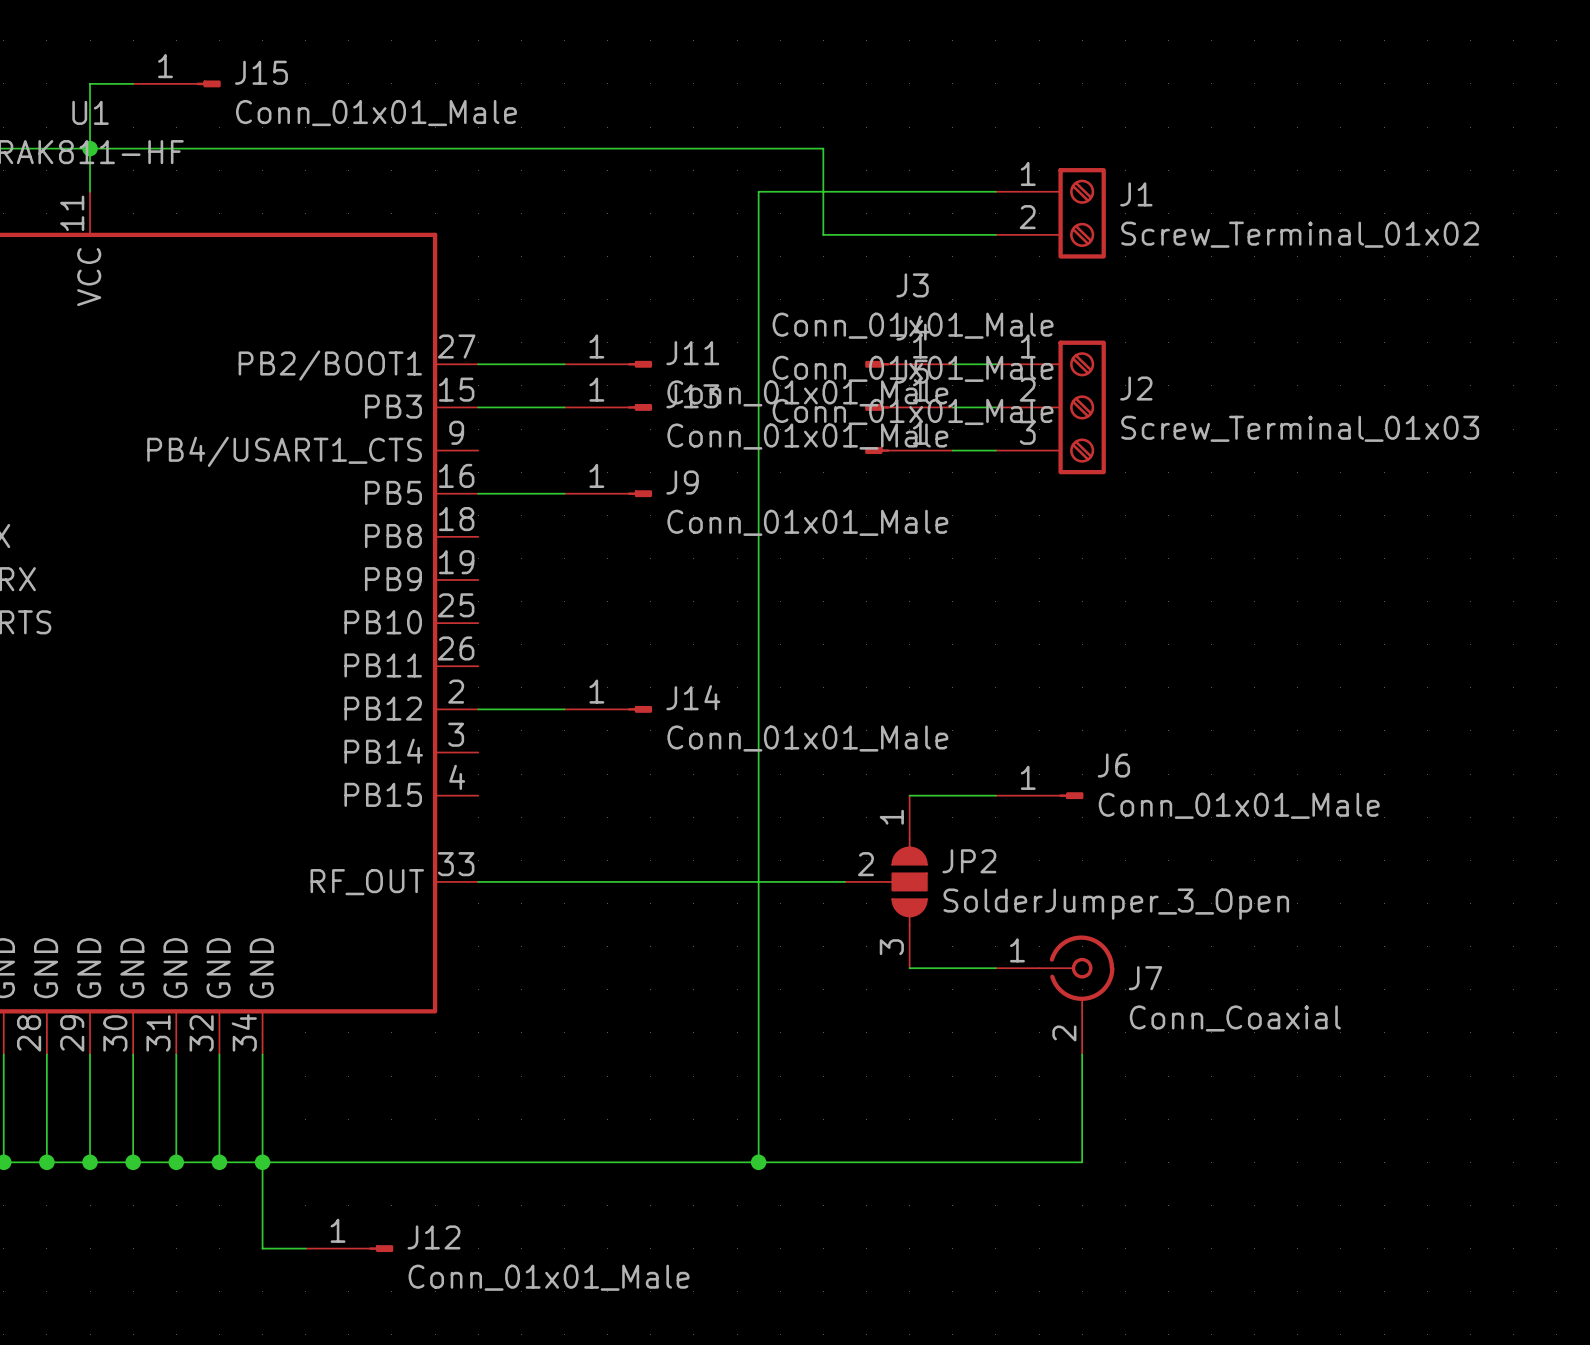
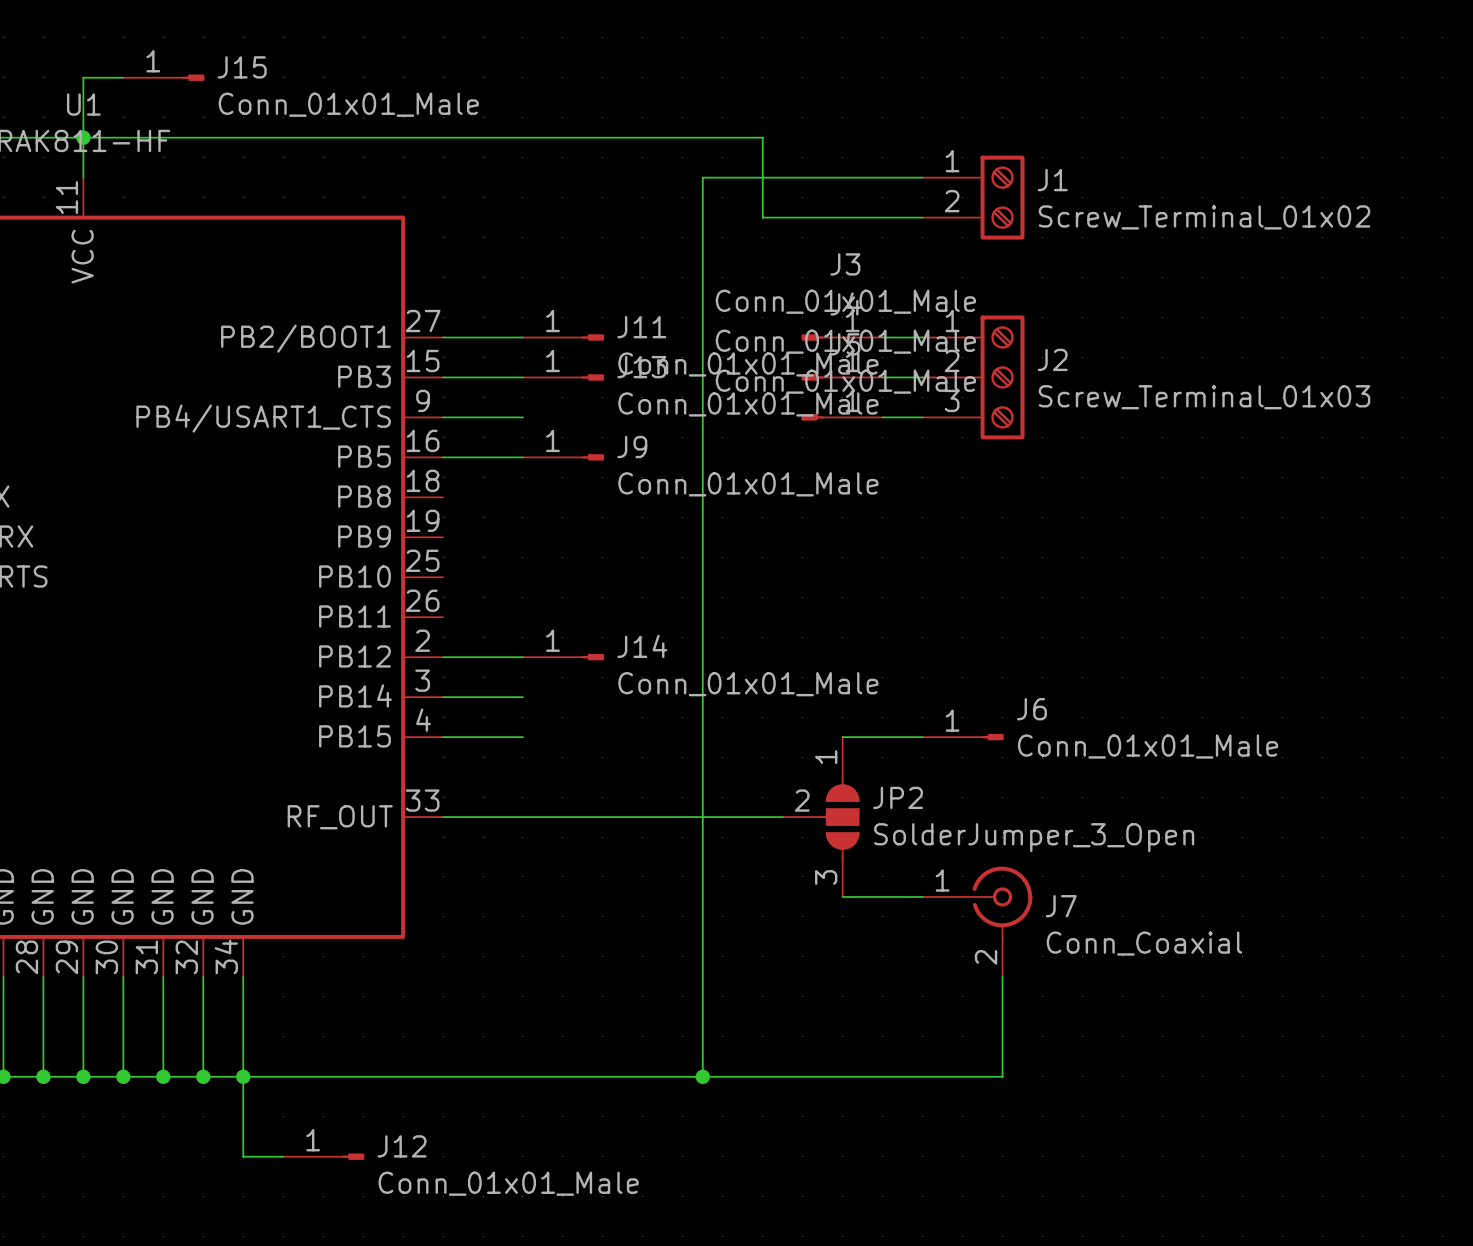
wire: none -> (443, 417) (522, 417)
wire: none -> (443, 697) (522, 697)
wire: none -> (443, 737) (522, 737)

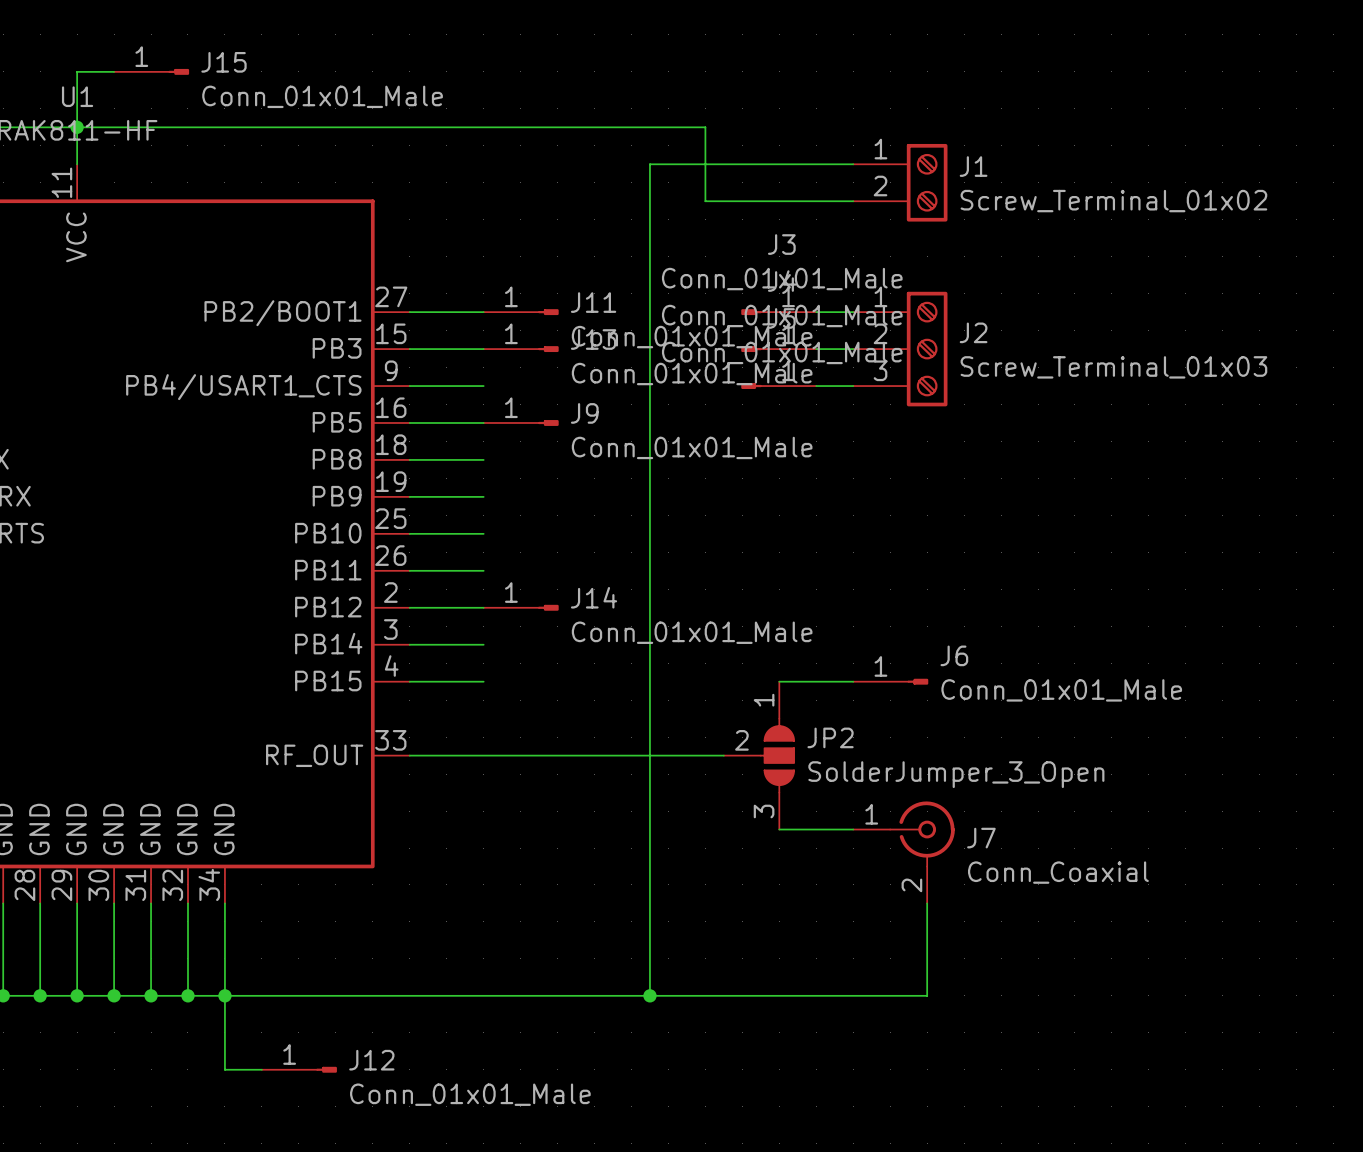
wire: none -> (409, 459) (483, 459)
wire: none -> (409, 496) (483, 496)
wire: none -> (409, 533) (483, 533)
wire: none -> (409, 570) (483, 570)

